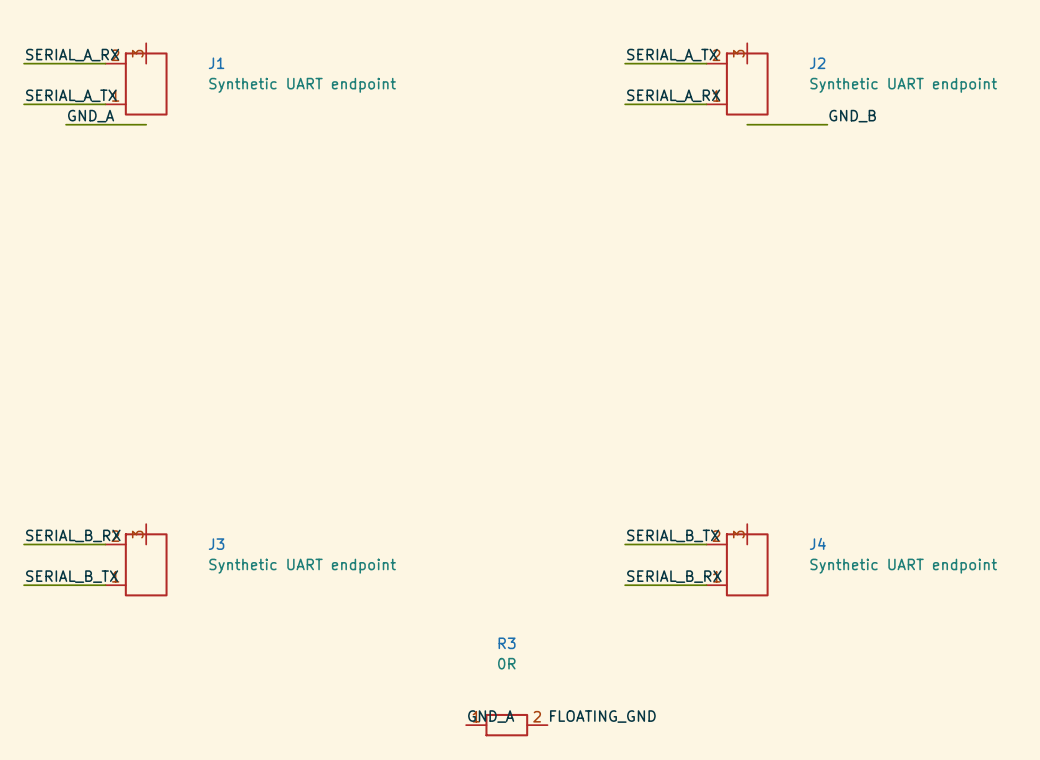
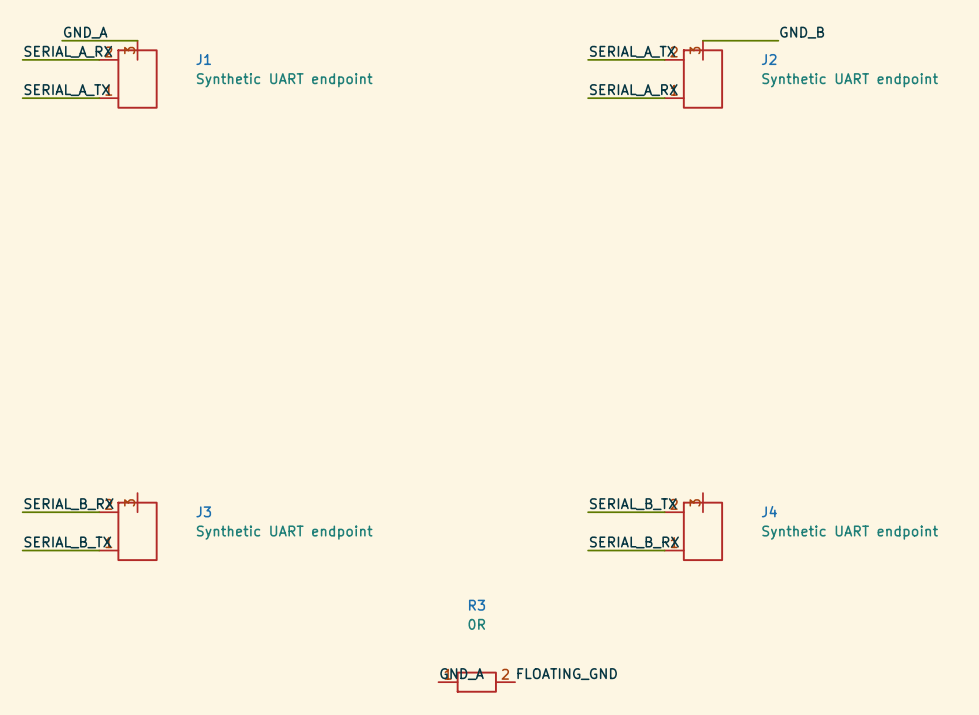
label position: GND_A (91, 116) -> GND_A (85, 32)
label position: GND_B (852, 116) -> GND_B (802, 32)
wire: (66, 124) (146, 124) -> (62, 40) (137, 40)
wire: (747, 124) (827, 124) -> (702, 40) (778, 40)

